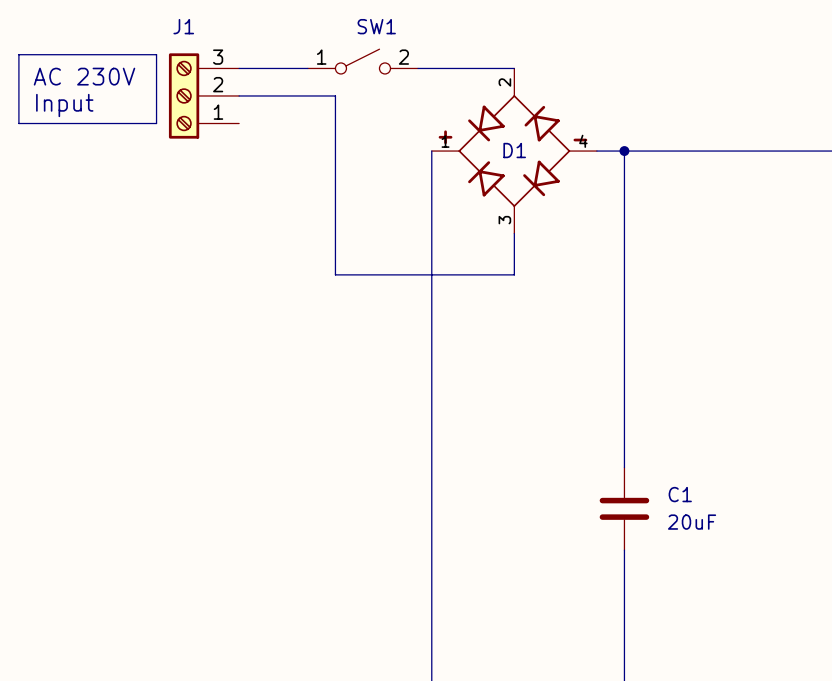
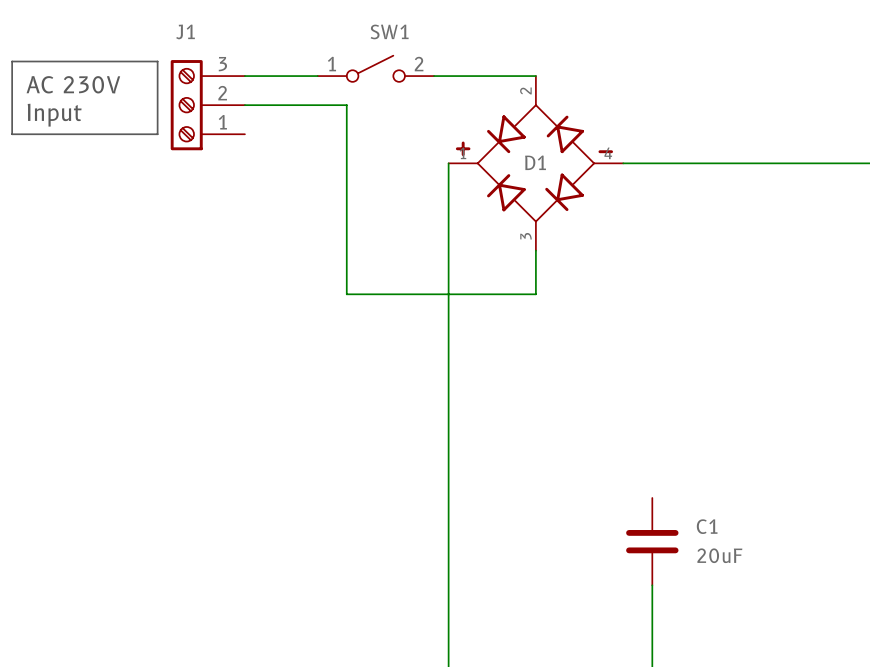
wire: (624, 151) (624, 467) -> none
junction: (624, 151) -> none

